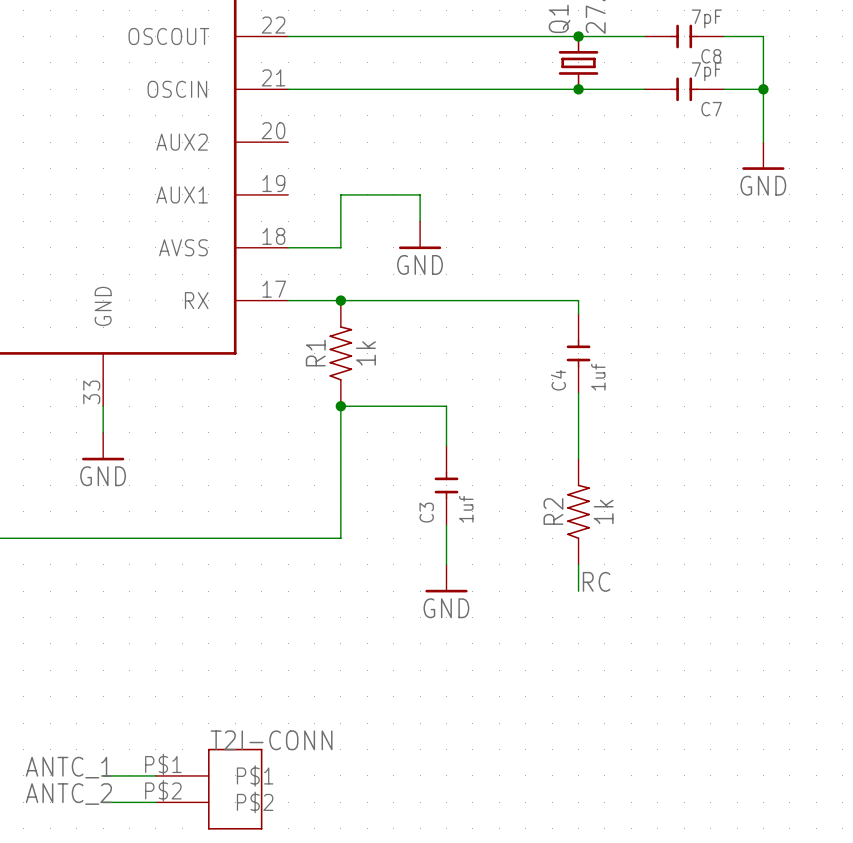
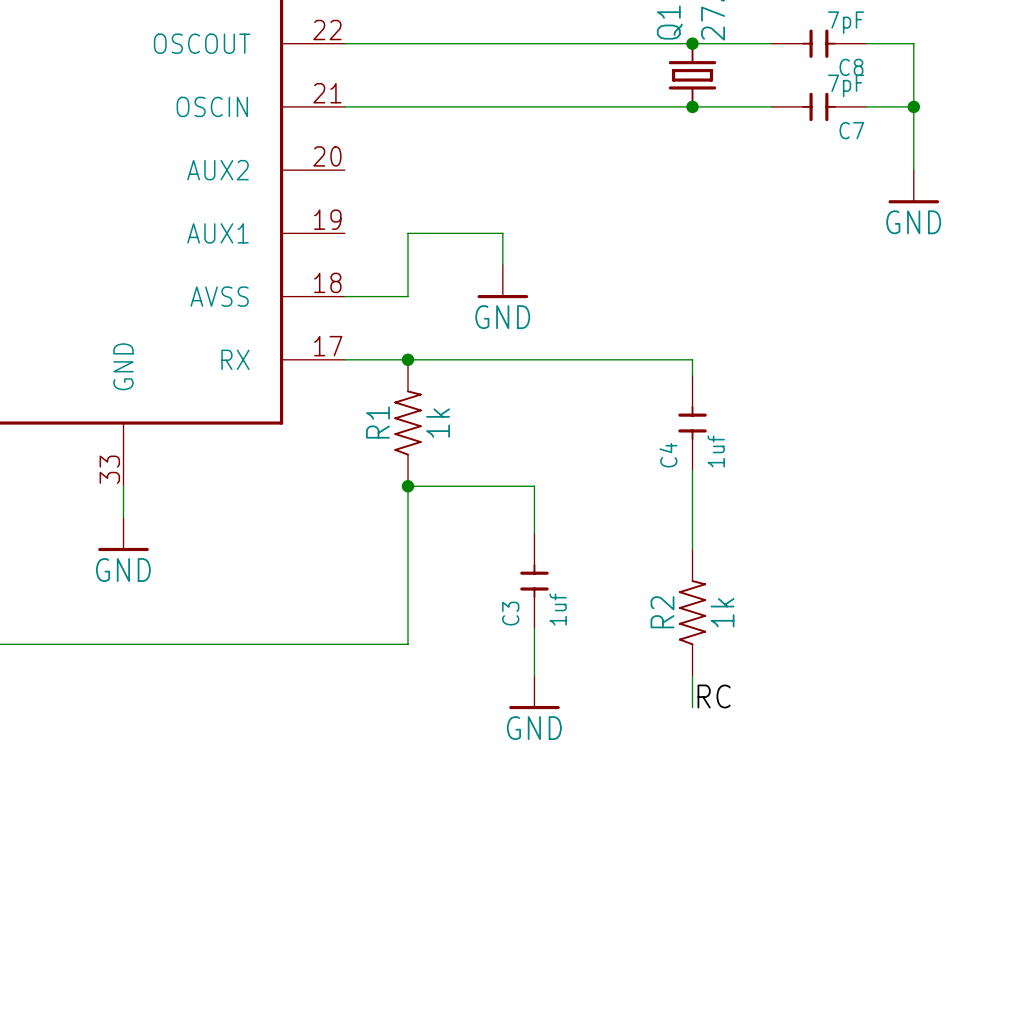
label: ANTC_1 (68, 767) -> none
wire: (103, 775) (155, 775) -> none
part: (209, 789) -> none
label: ANTC_2 (68, 794) -> none
wire: (103, 802) (155, 802) -> none

